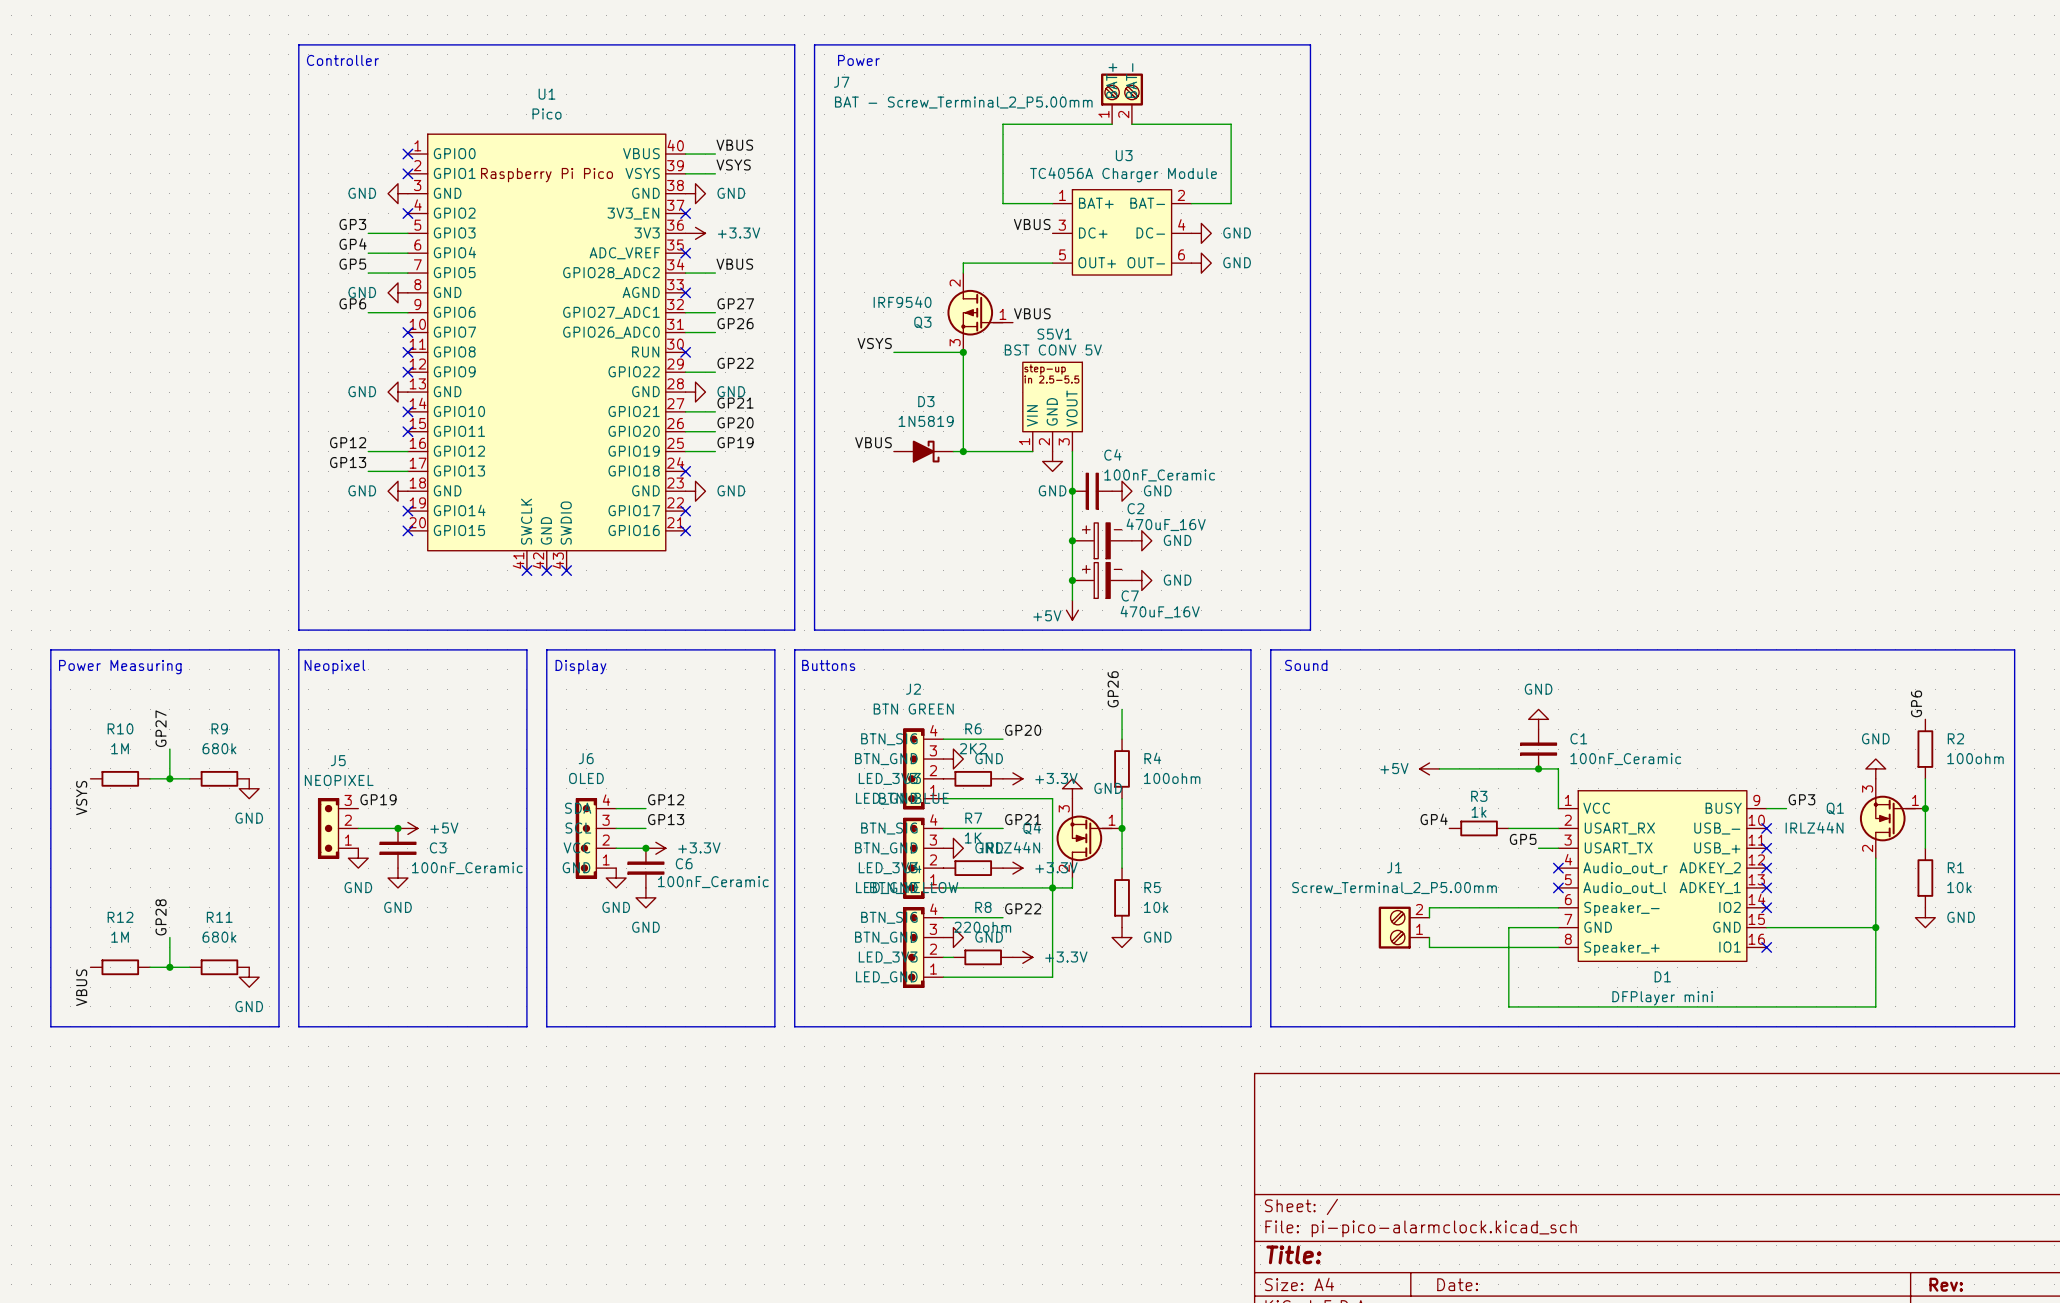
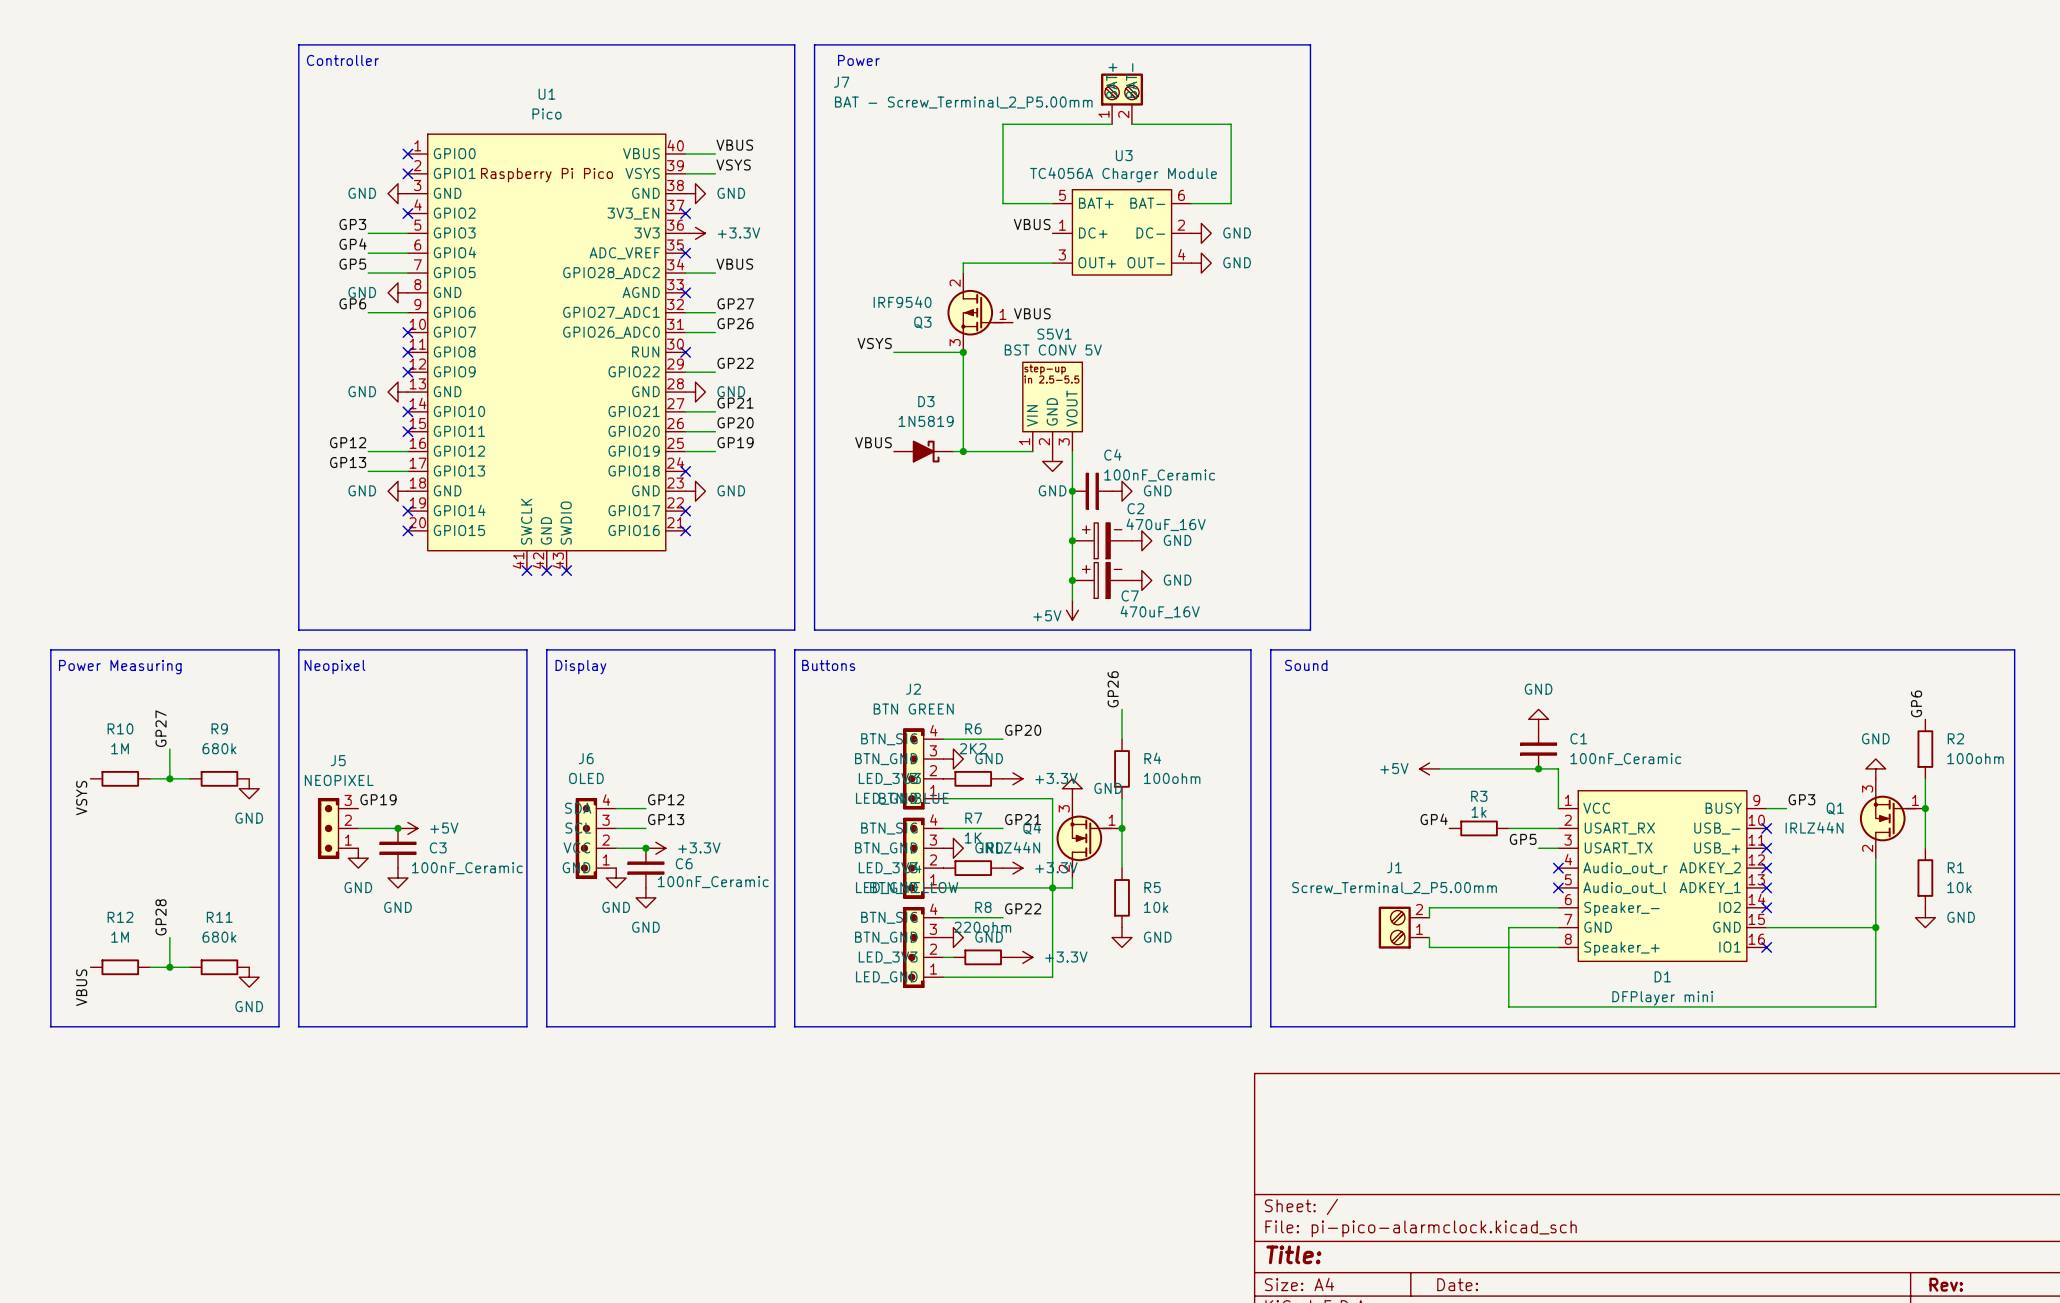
U3 pin number: 1 (1062, 195) -> 5 (1062, 195)
U3 pin number: 2 (1181, 195) -> 6 (1181, 195)
U3 pin number: 4 (1181, 224) -> 2 (1181, 225)
U3 pin number: 3 (1062, 225) -> 1 (1062, 225)
U3 pin number: 5 (1062, 254) -> 3 (1062, 254)
U3 pin number: 6 (1181, 254) -> 4 (1181, 254)

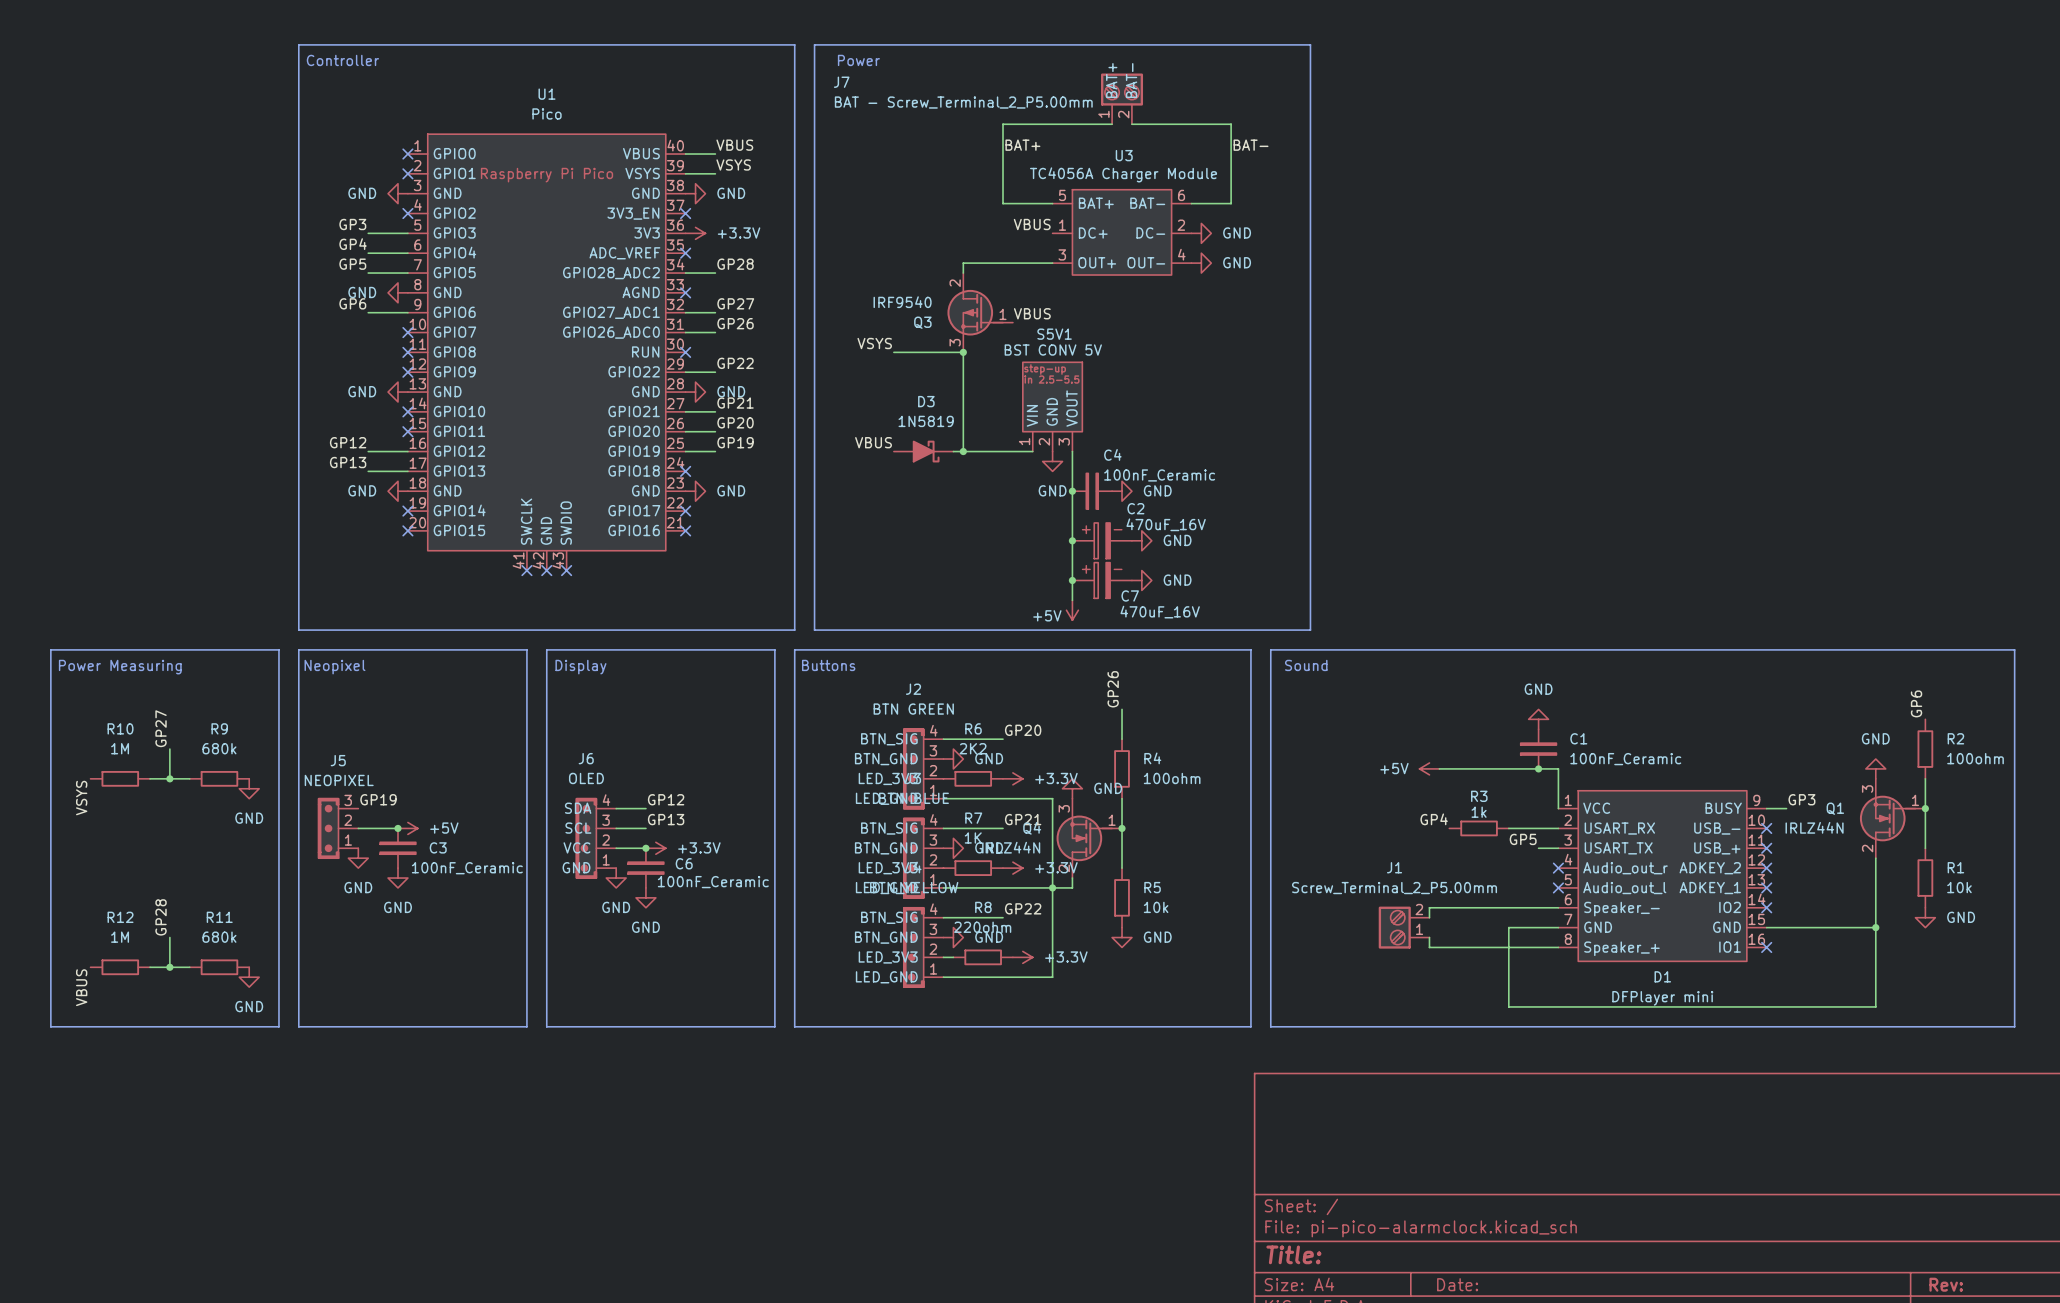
label: none -> BAT+ (1022, 145)
label: none -> BAT- (1251, 145)
label: VBUS (734, 264) -> GP28 (735, 264)

